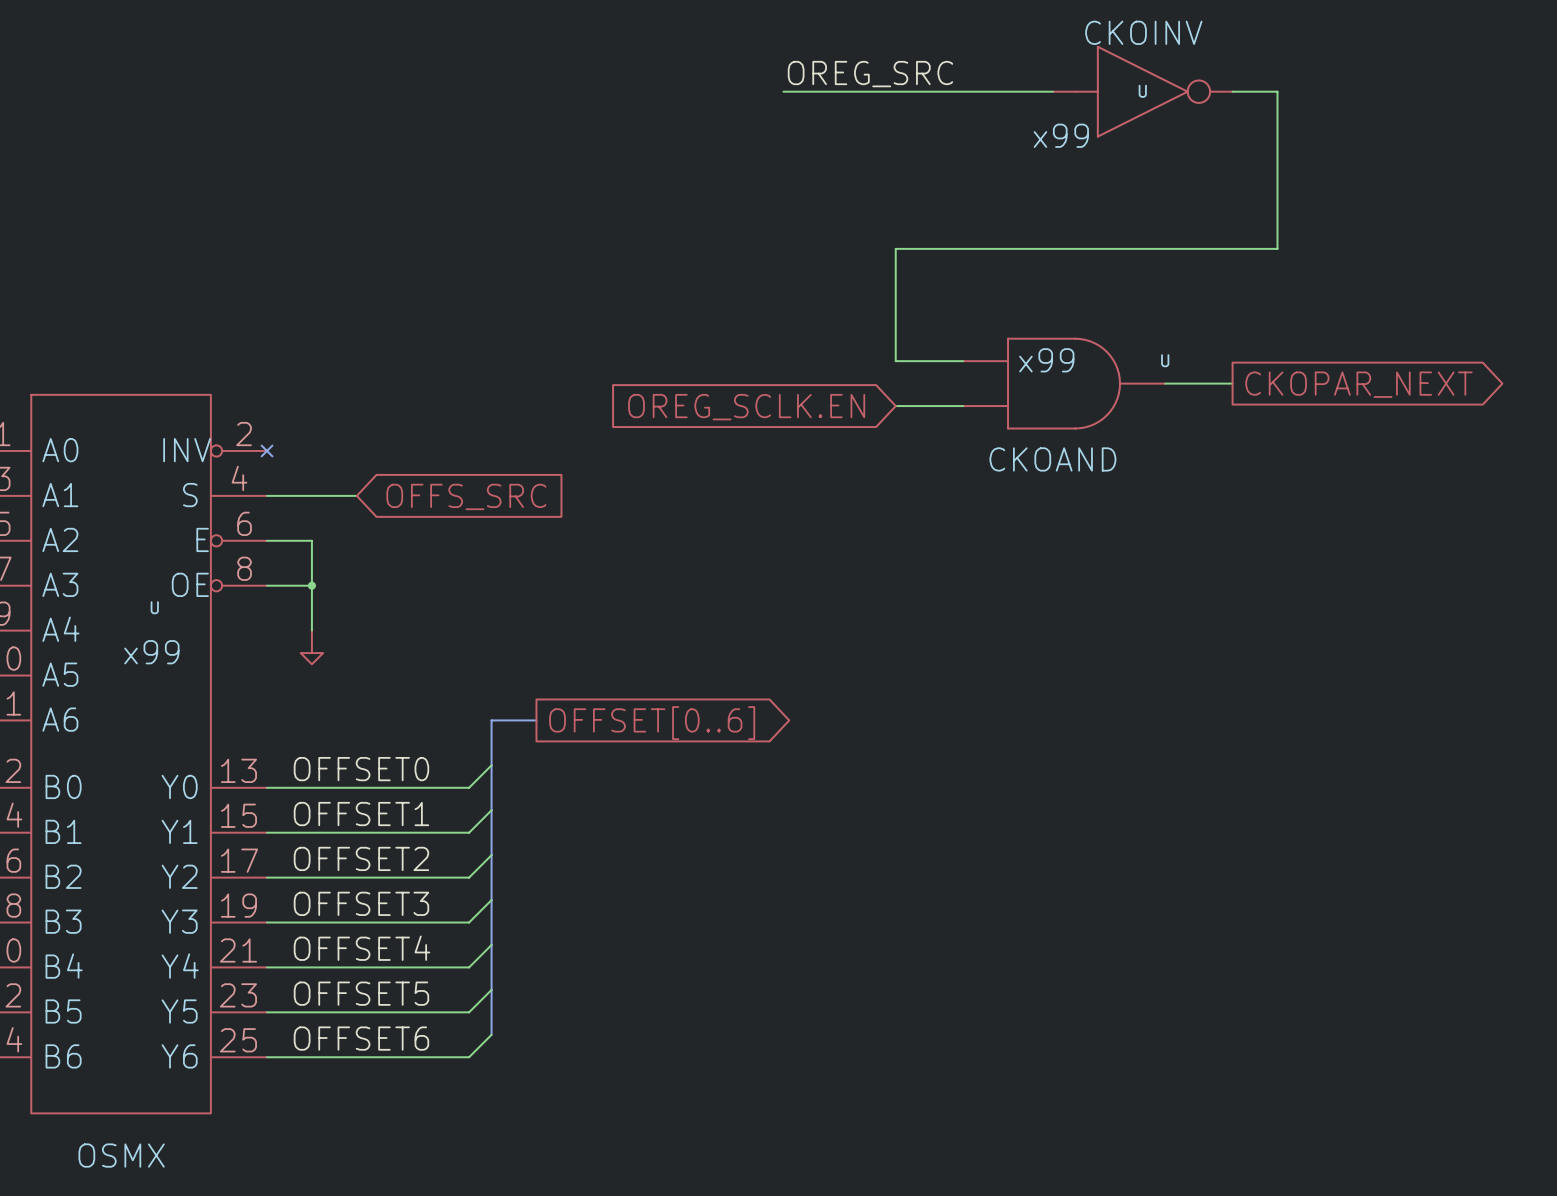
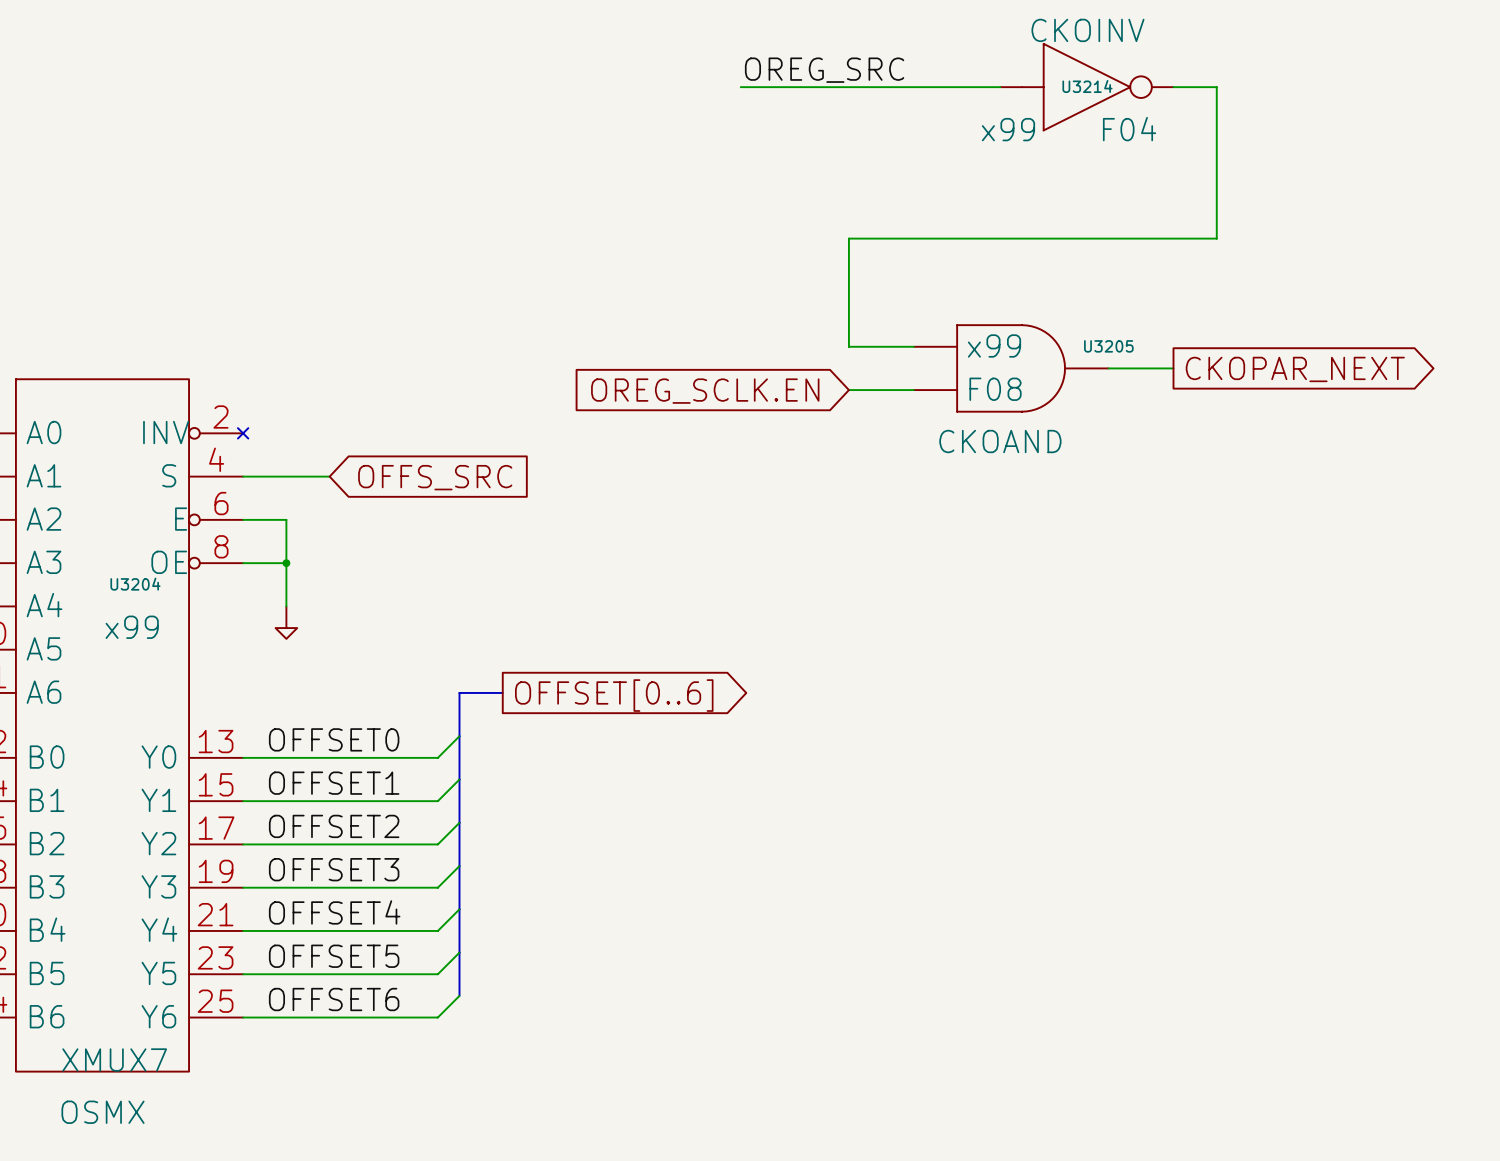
U name: U (1142, 91) -> U3214 (1087, 86)
U value: none -> F04 (1129, 129)
U name: U (1165, 360) -> U3205 (1108, 346)
U value: none -> F08 (995, 389)
U name: U (154, 607) -> U3204 (135, 584)
U value: none -> XMUX7 (114, 1059)

